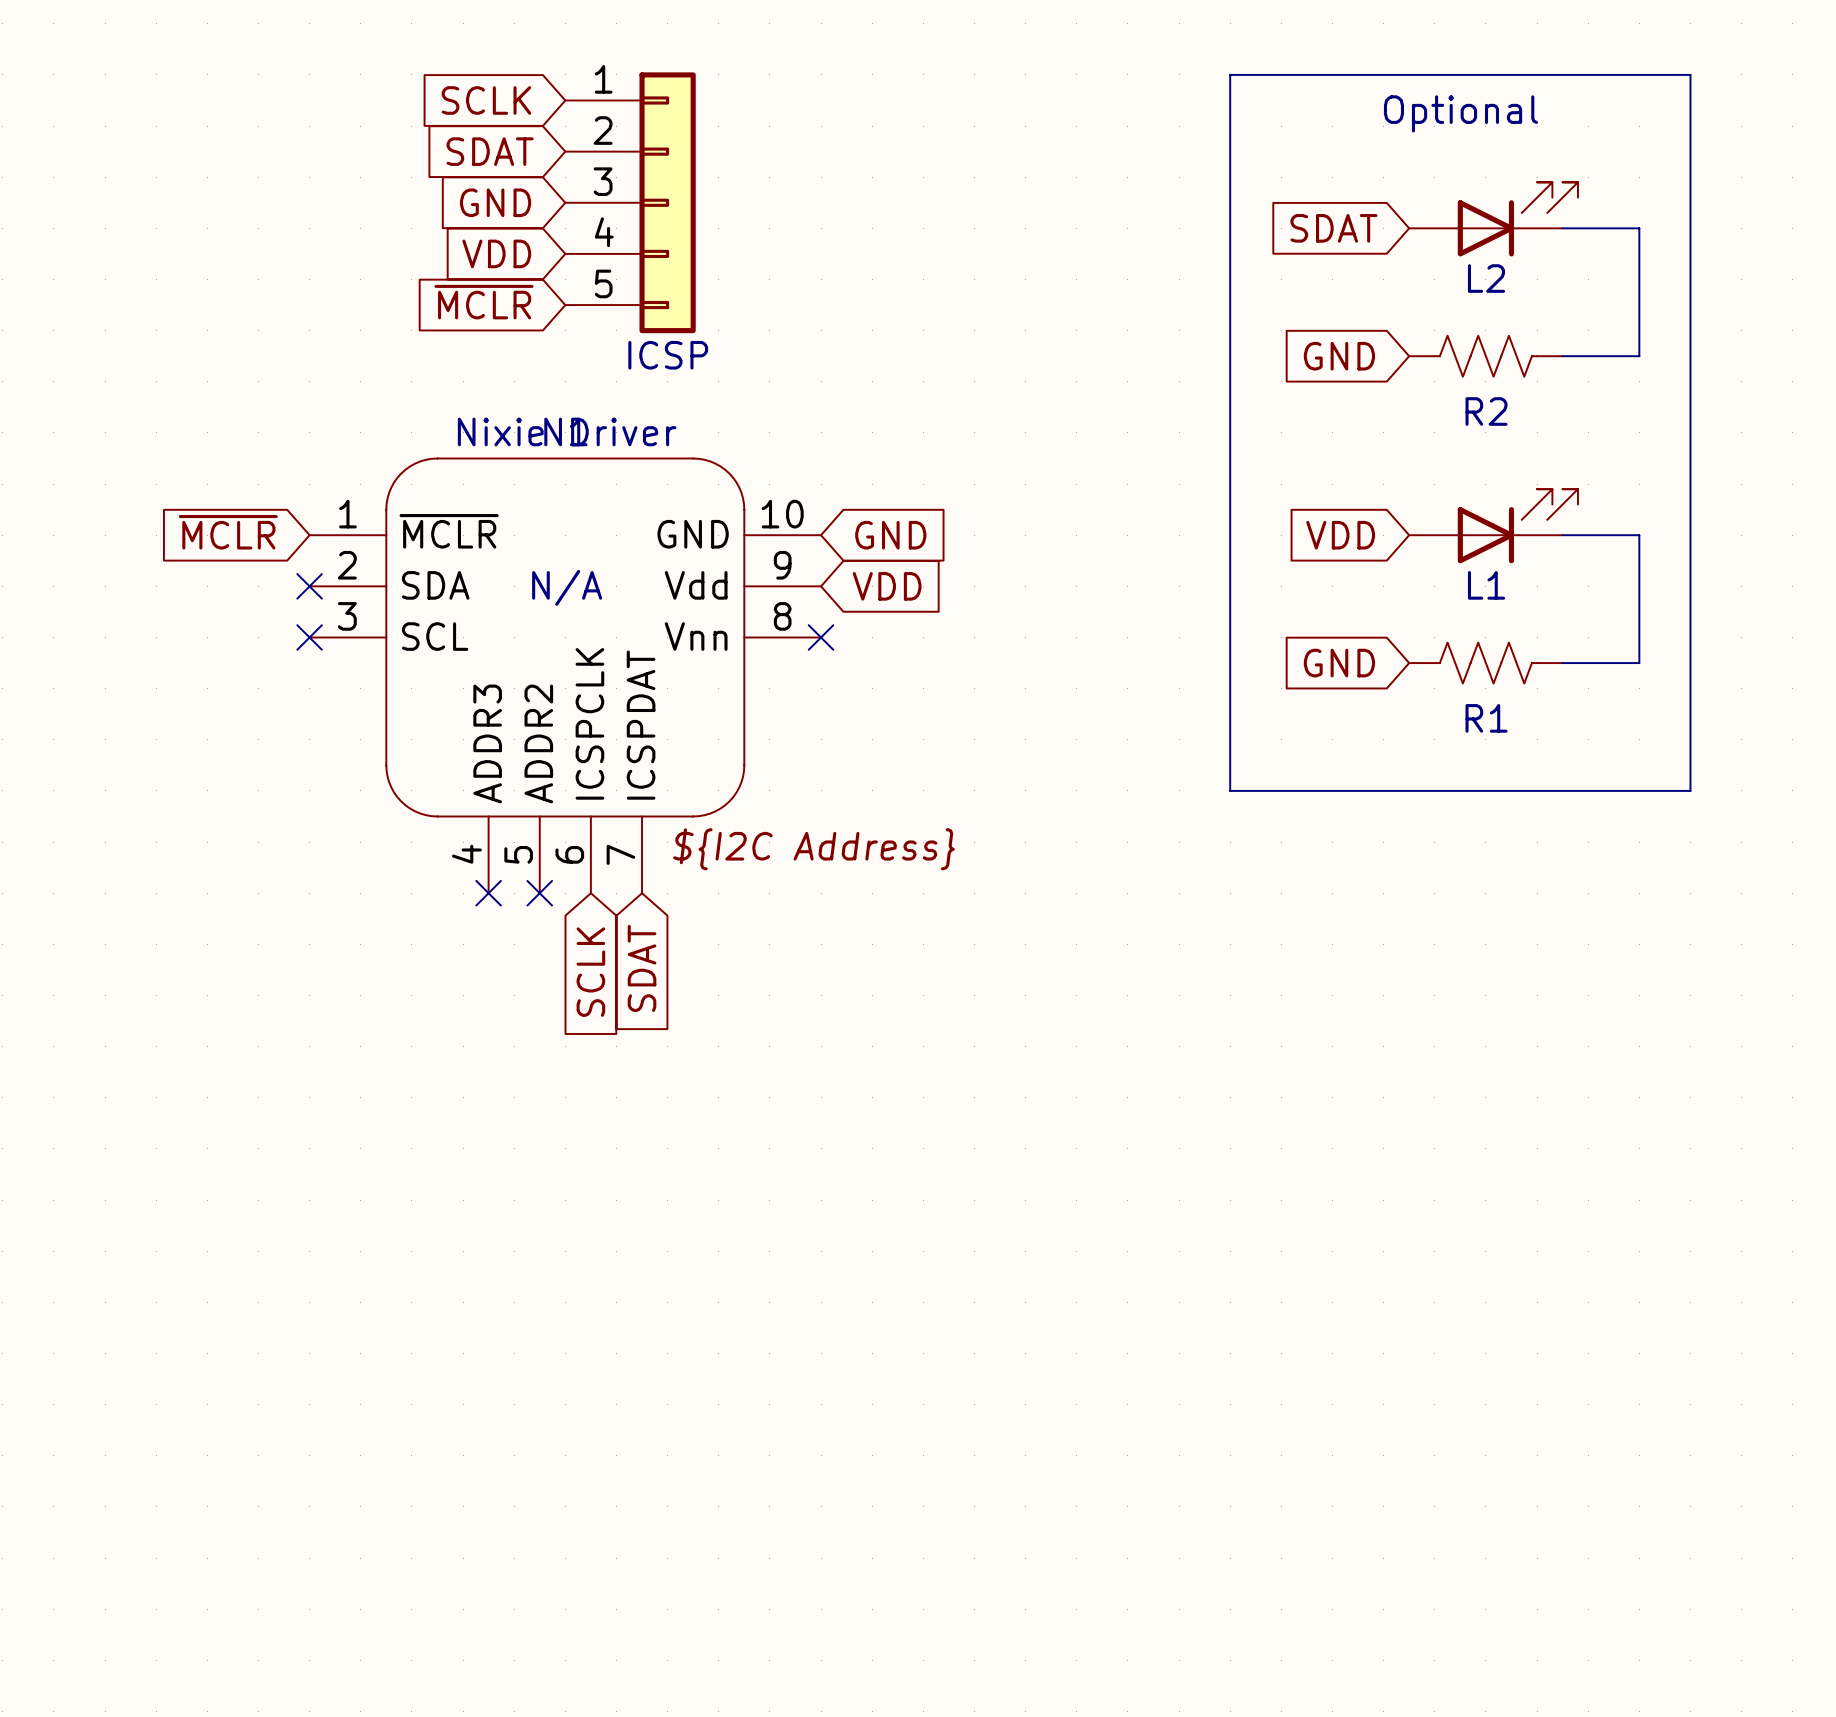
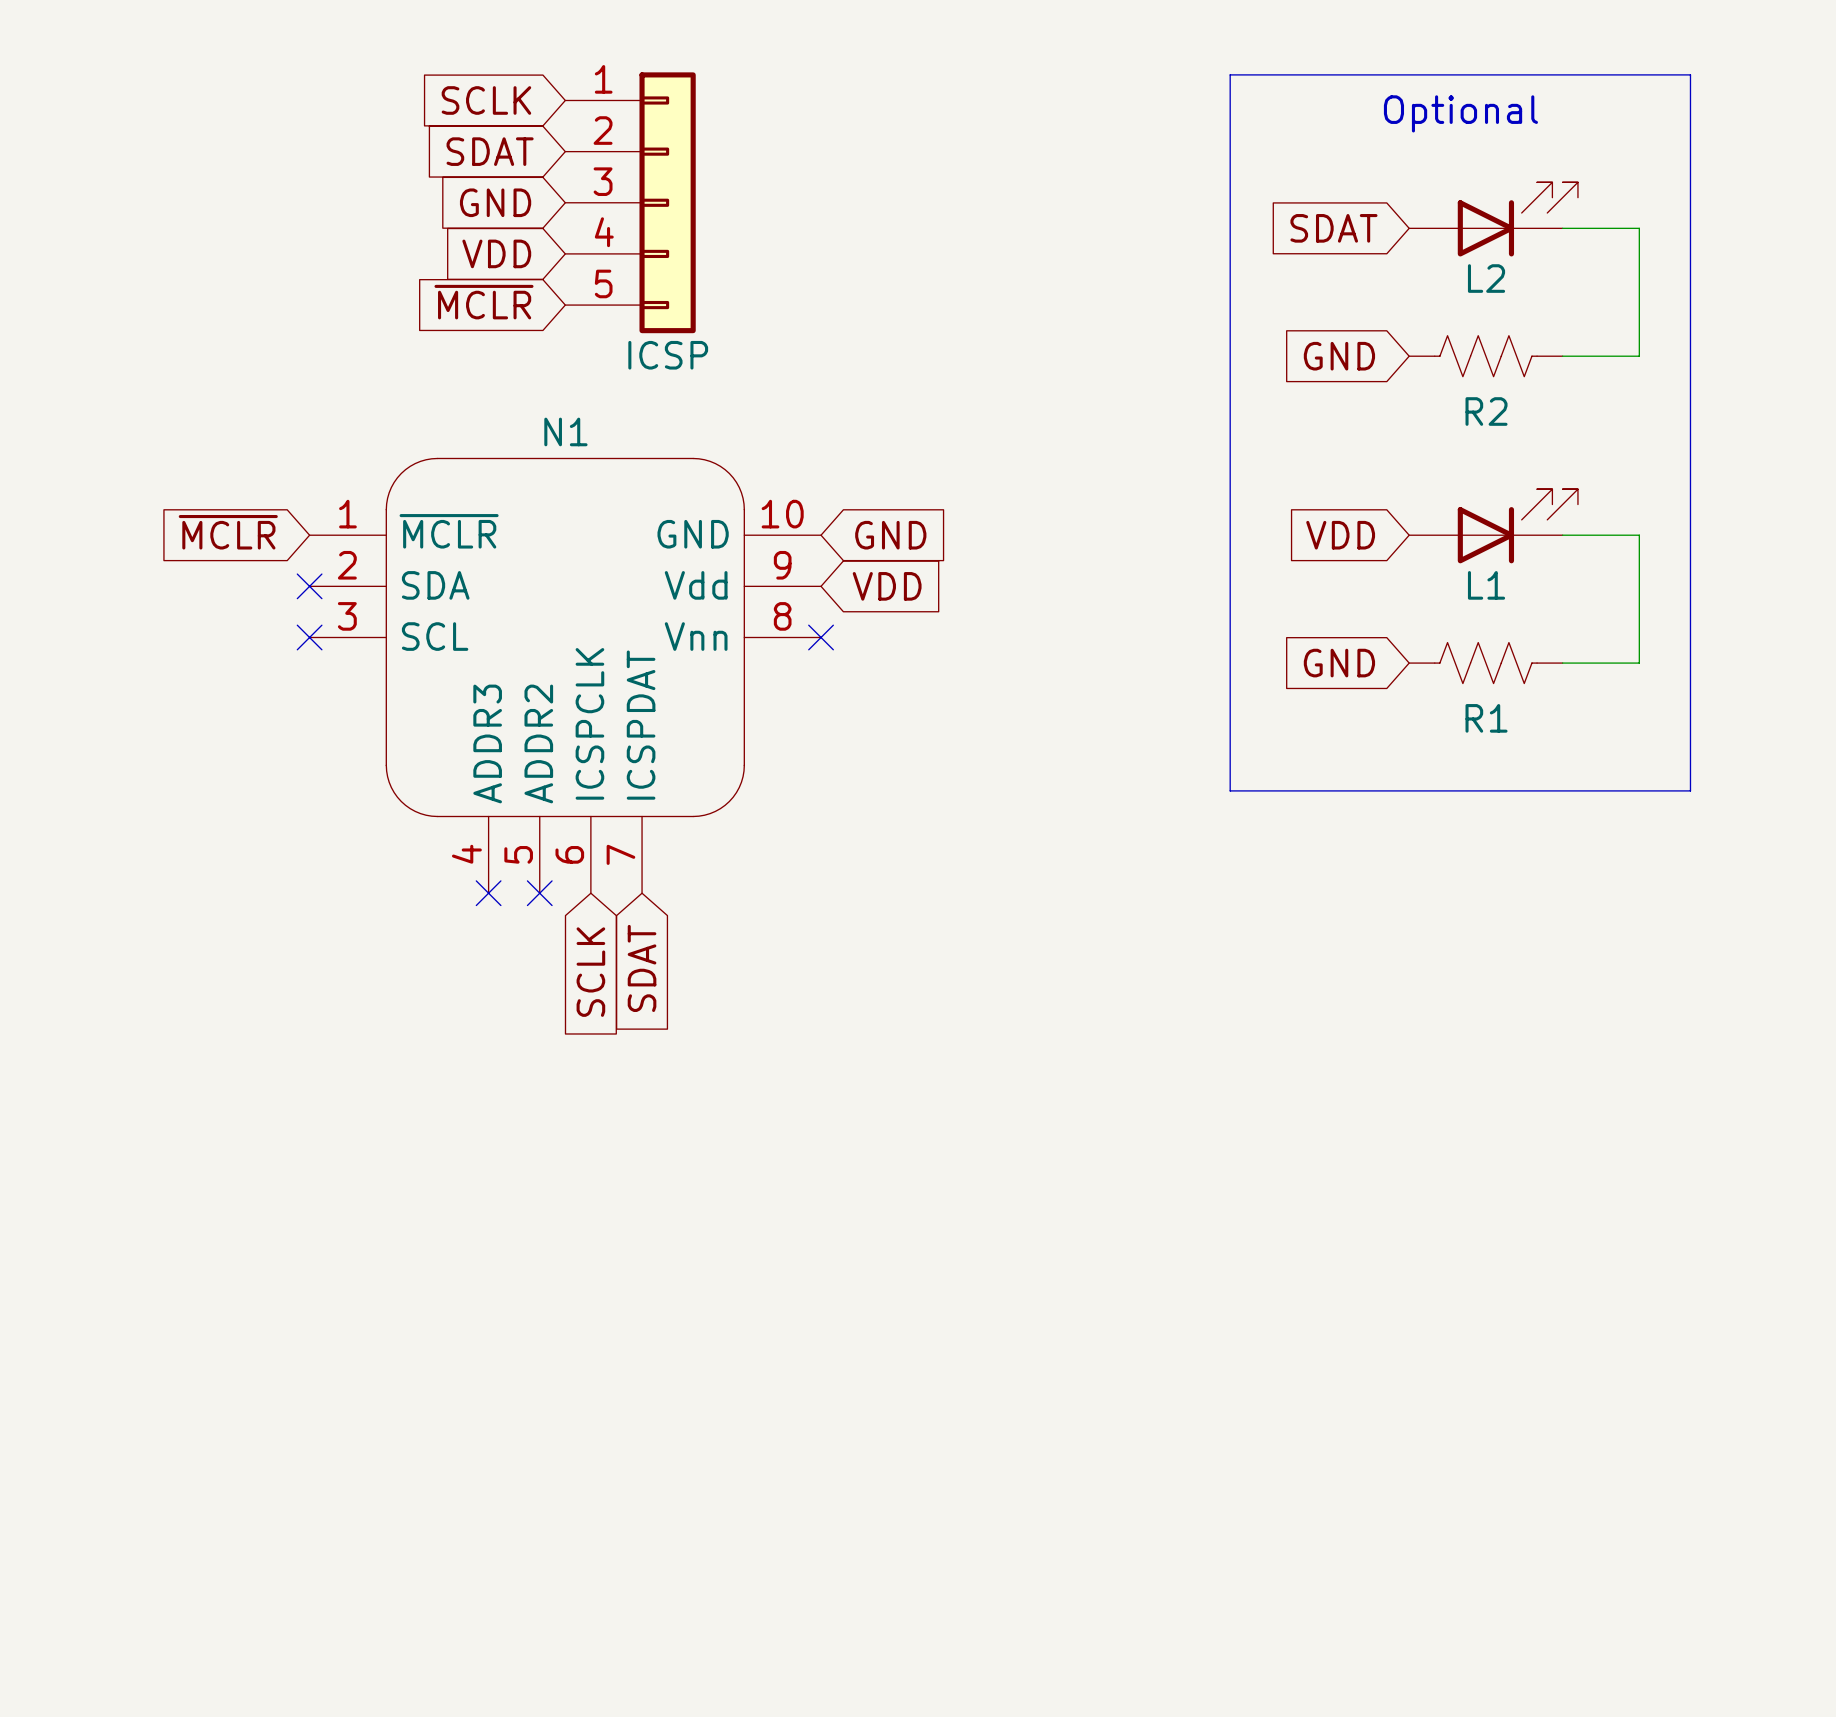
N1 value: Nixie Driver (567, 431) -> none
N1 text: N/A (567, 587) -> none
N1 text: ${I2C Address} (814, 849) -> none

